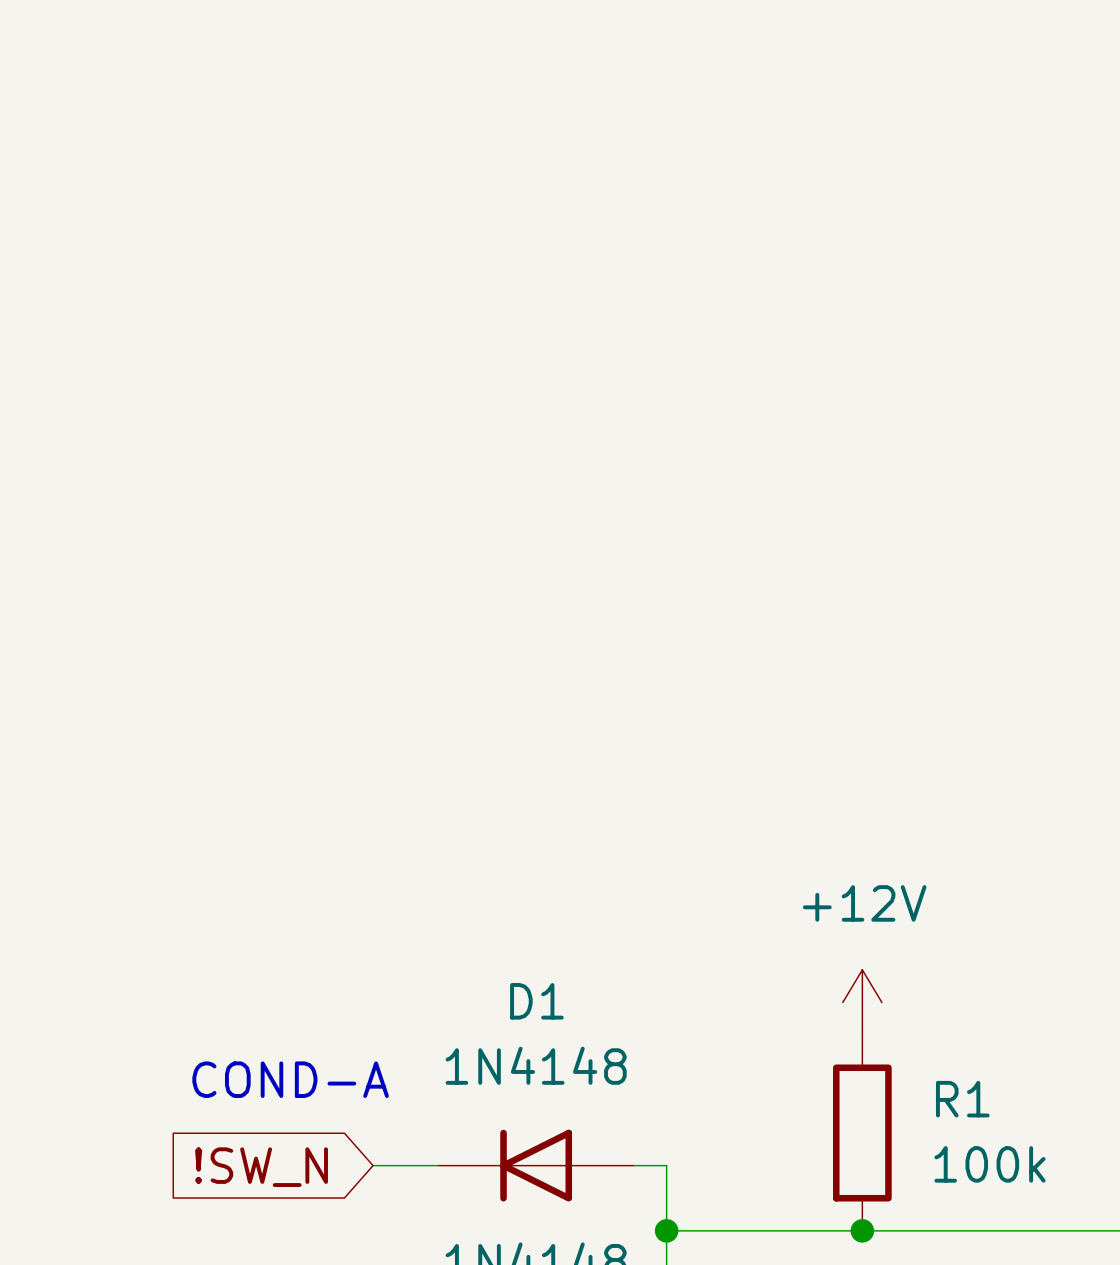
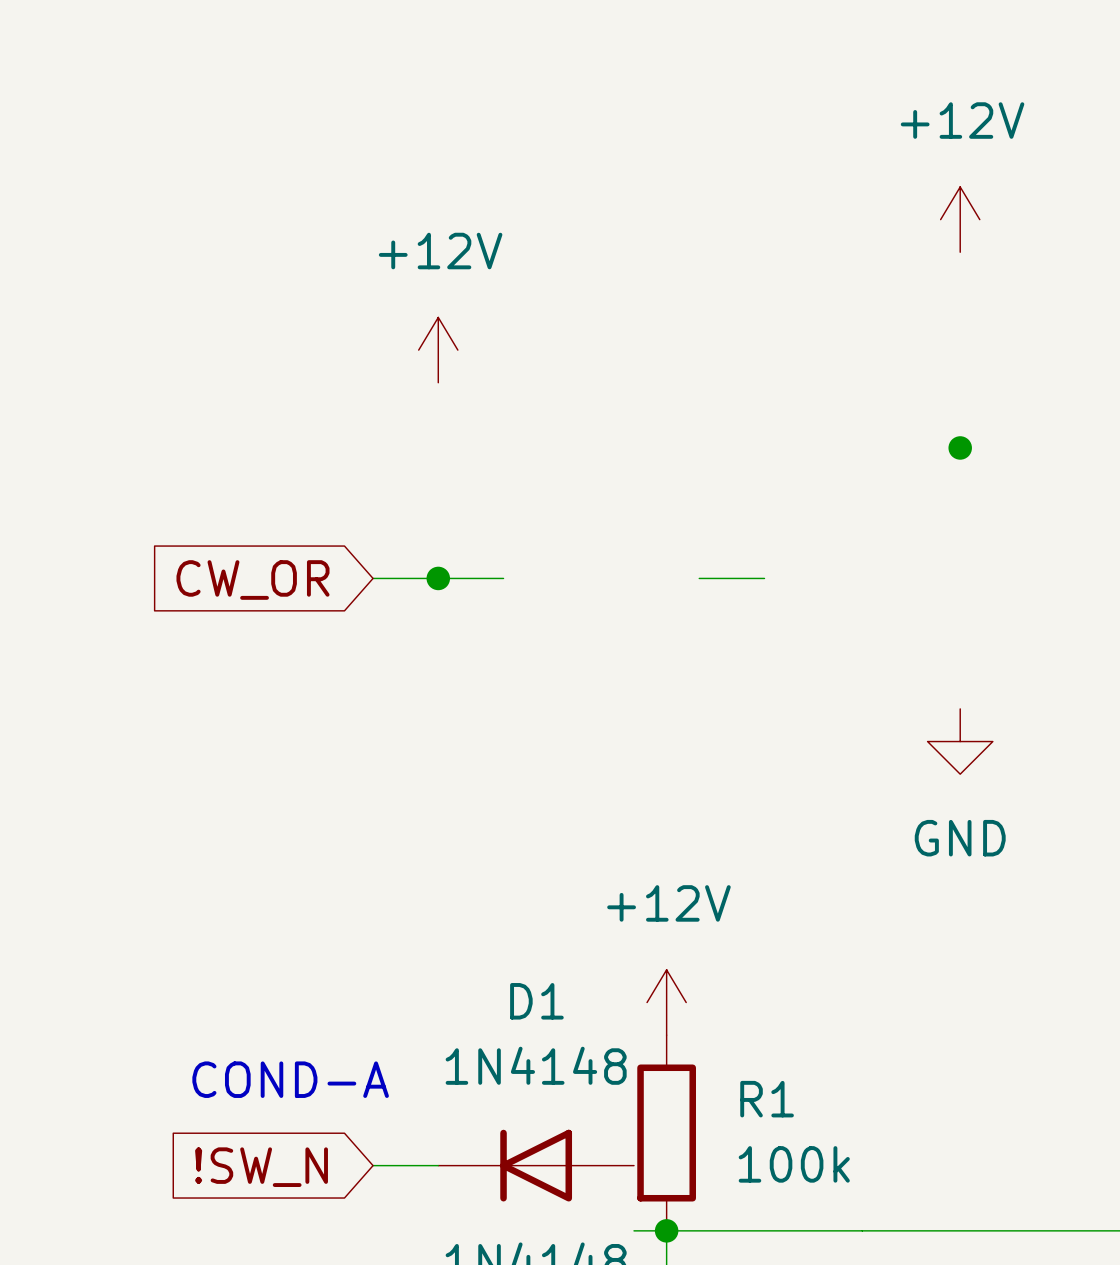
power symbol: none -> +12V (960, 219)
power symbol: none -> +12V (438, 350)
junction: none -> (960, 447)
wire: none -> (373, 578) (503, 578)
junction: none -> (438, 578)
wire: none -> (699, 578) (764, 578)
global label: none -> CW_OR (252, 580)
power symbol: none -> GND (960, 741)
power symbol position: +12V (862, 1002) -> +12V (666, 1002)
R1 position: (862, 1133) -> (666, 1133)
wire: (634, 1165) (666, 1165) (666, 1230) -> (634, 1230) (666, 1230)
junction: (862, 1230) -> none

